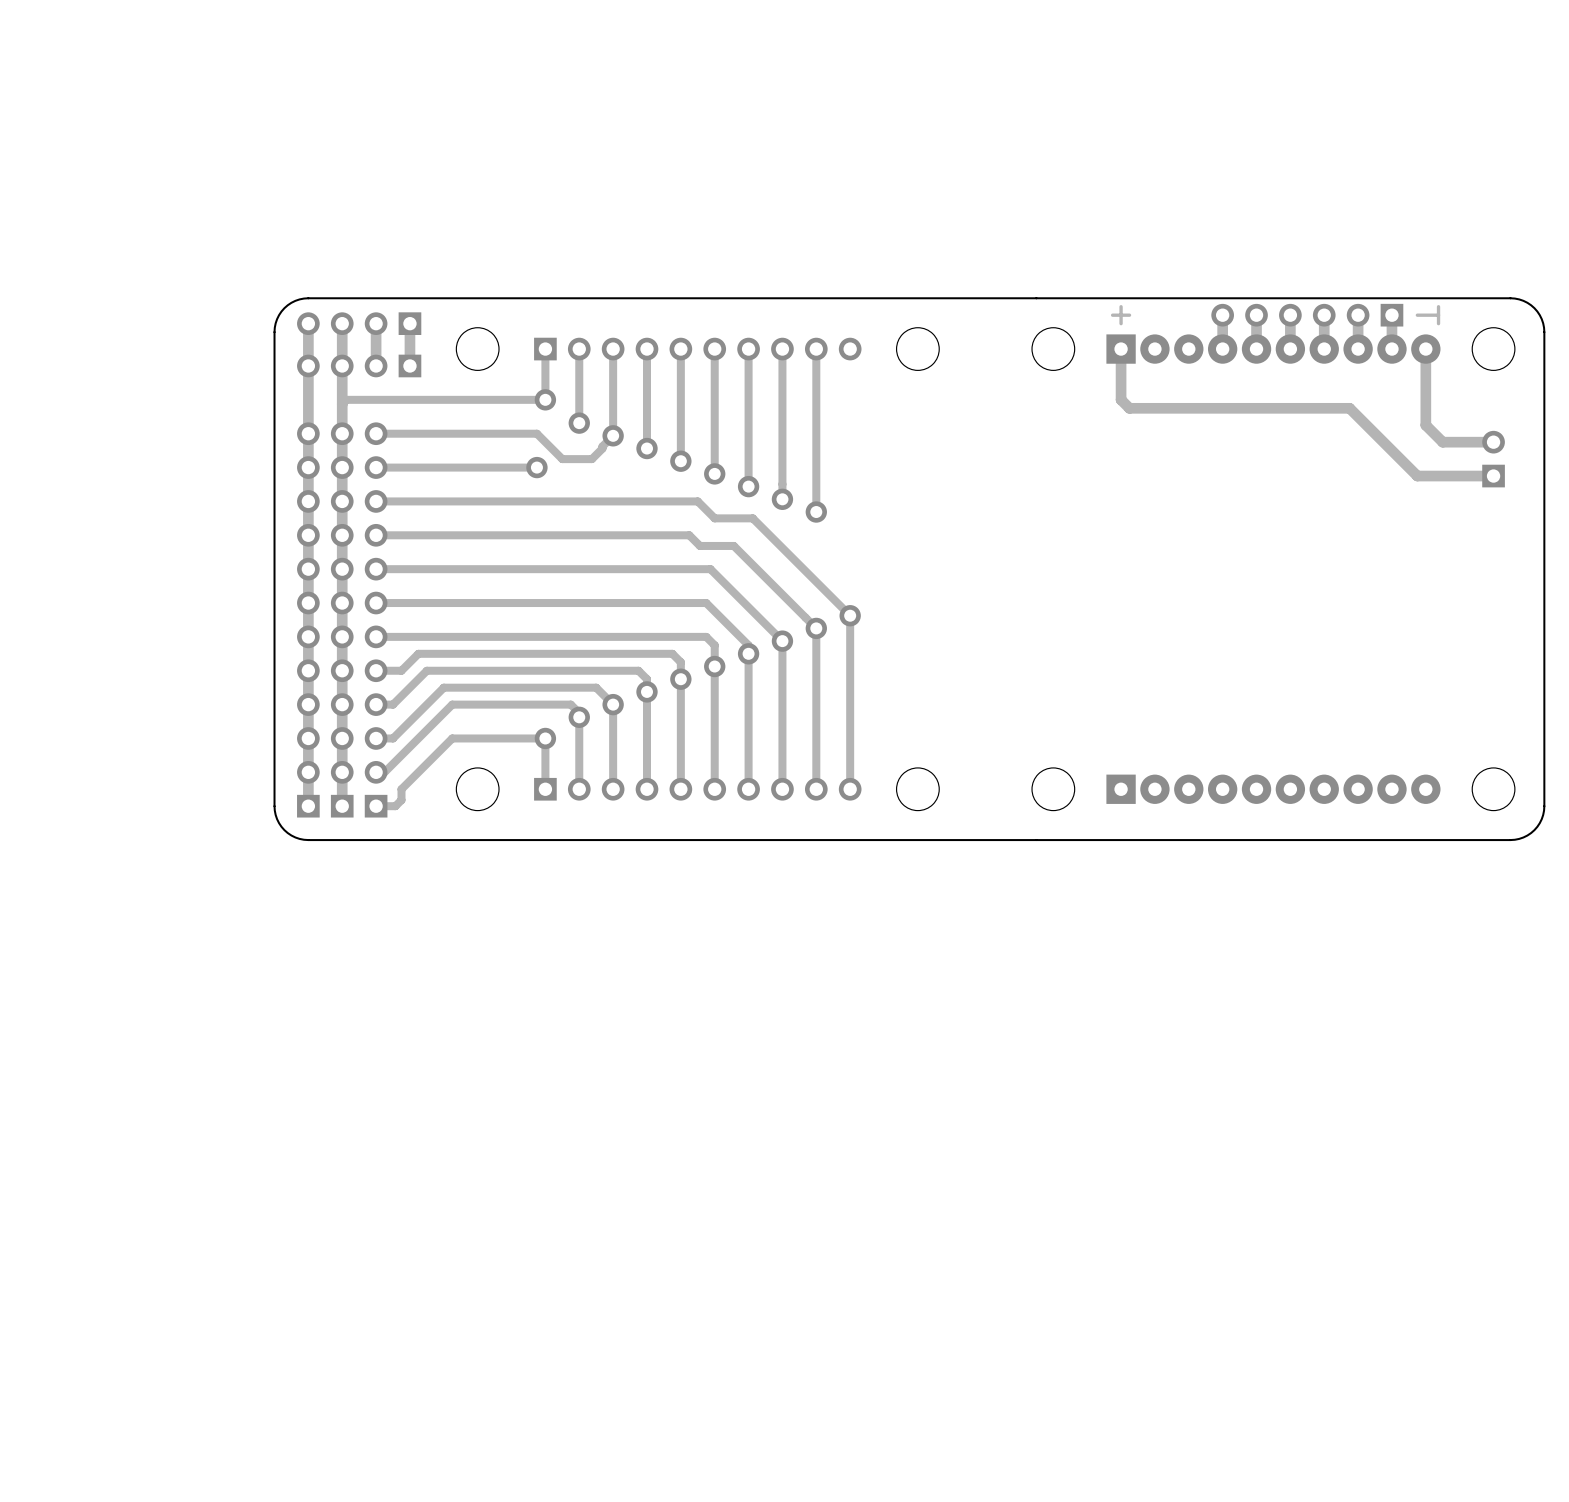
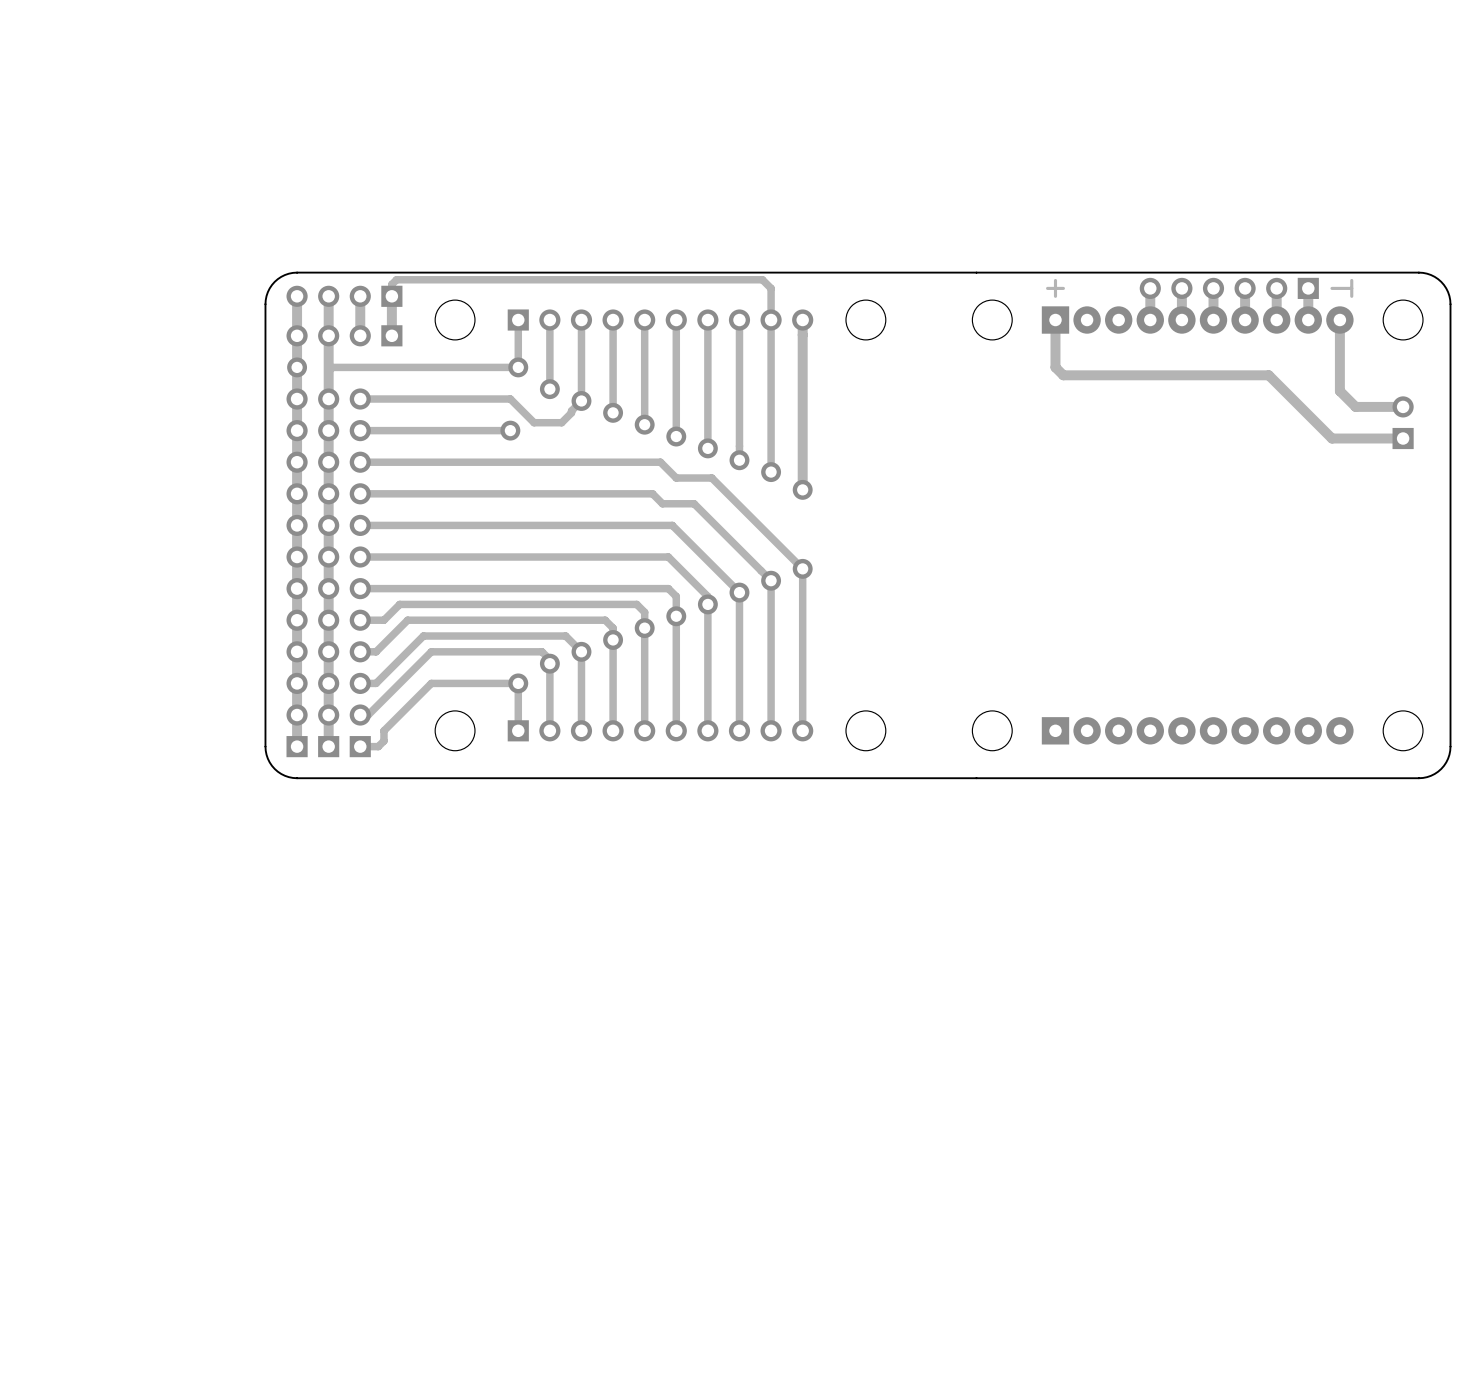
track: none -> (391, 296) (391, 284) (396, 279) (762, 279) (771, 288) (771, 320)
track: none -> (802, 320) (802, 489)
via: none -> (297, 367)
via: none -> (802, 489)

